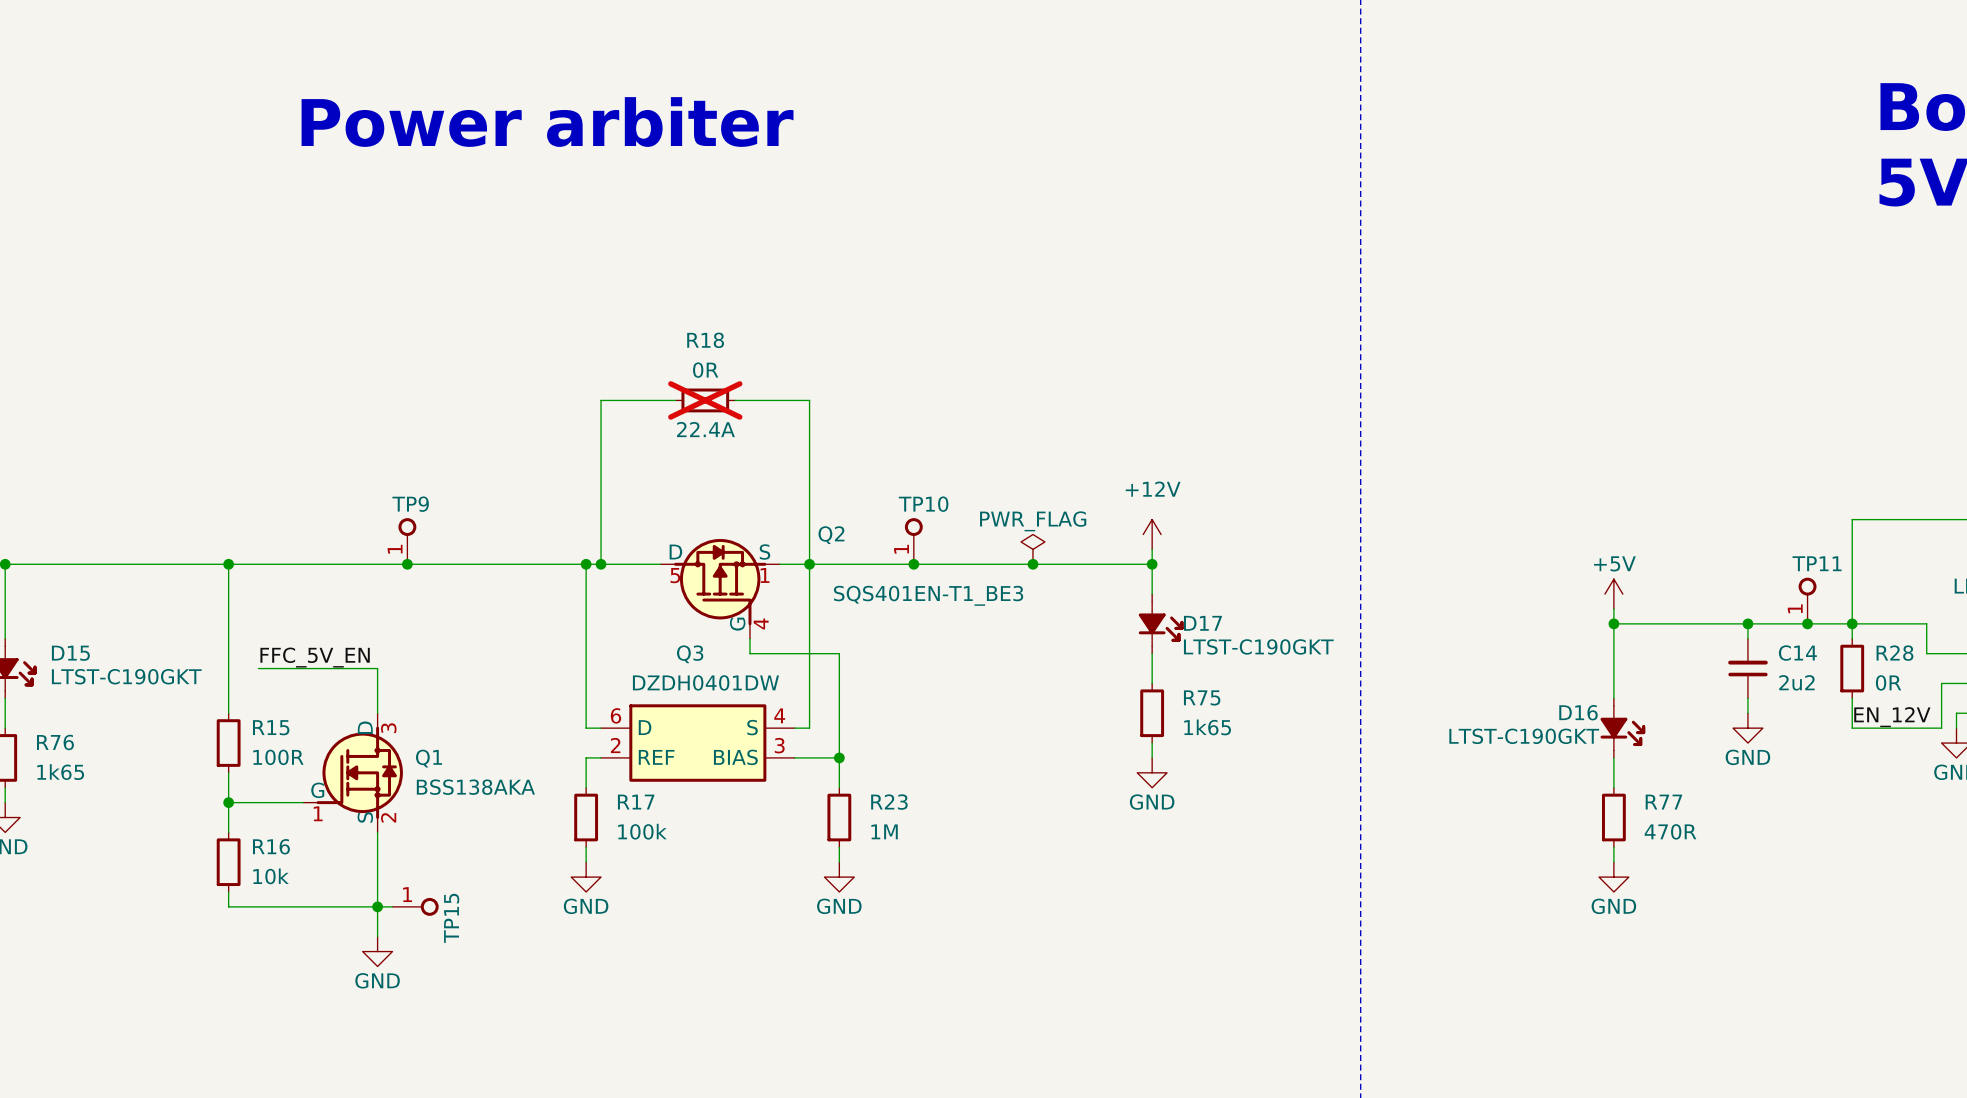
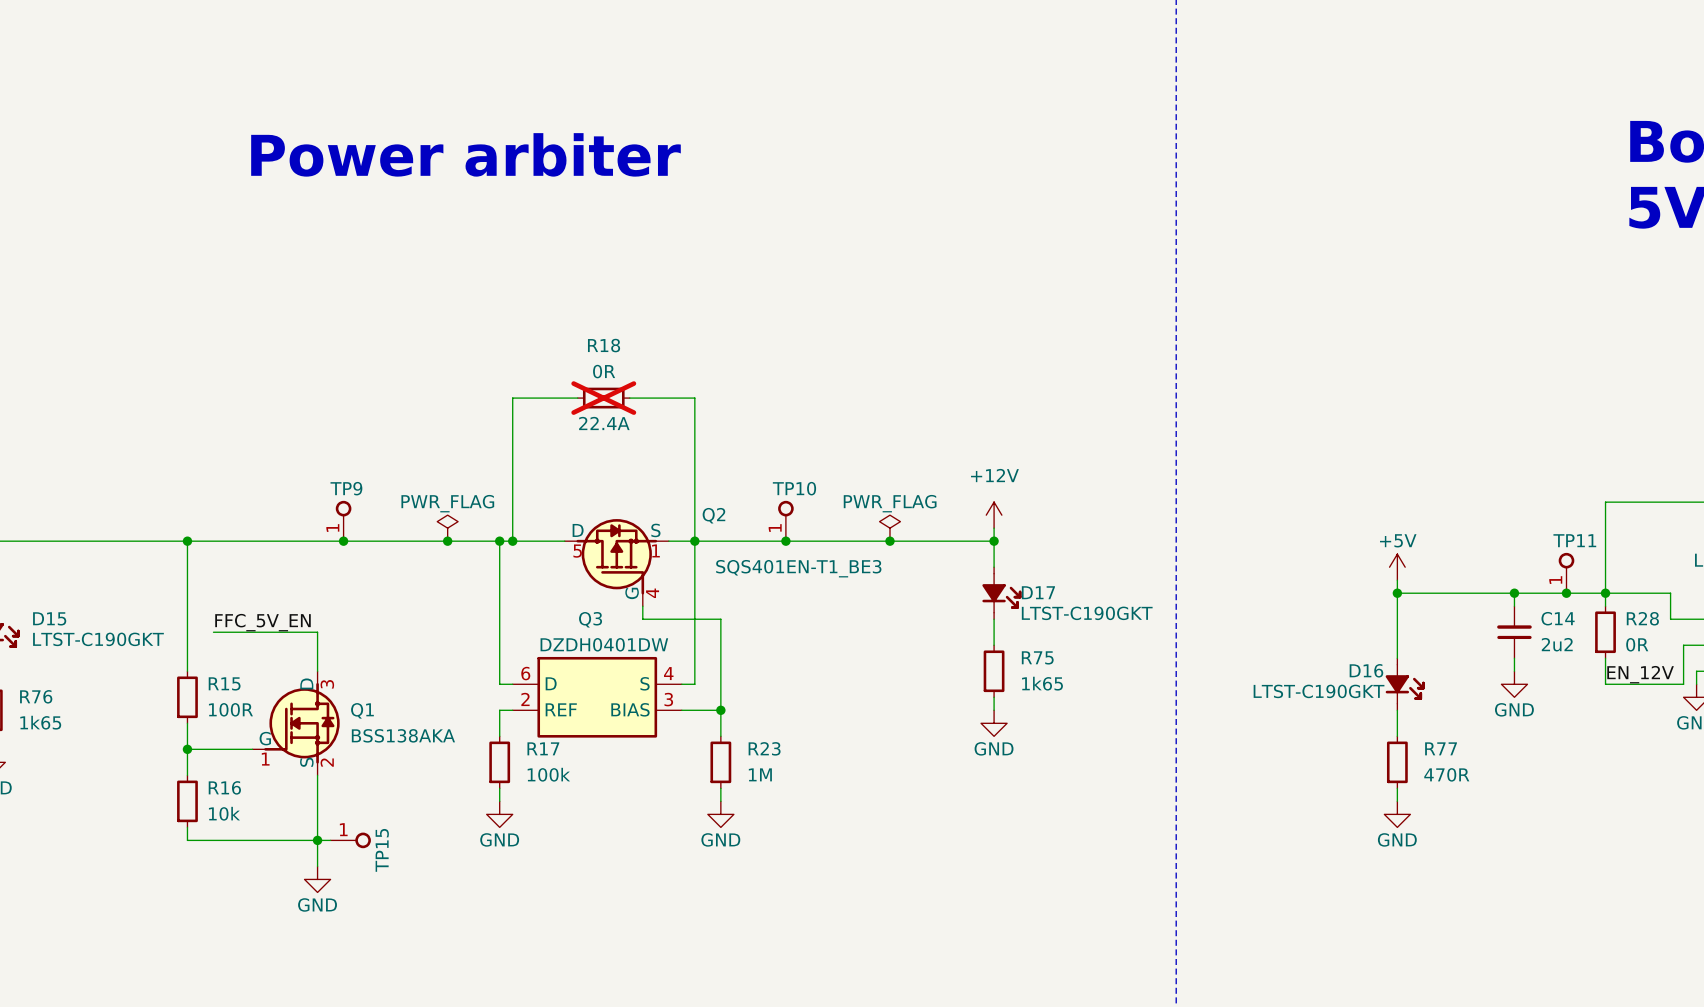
power symbol: none -> PWR_FLAG (447, 528)
junction: none -> (447, 541)
Q3 symbol: [601, 704, 795, 782] -> [512, 656, 682, 738]

